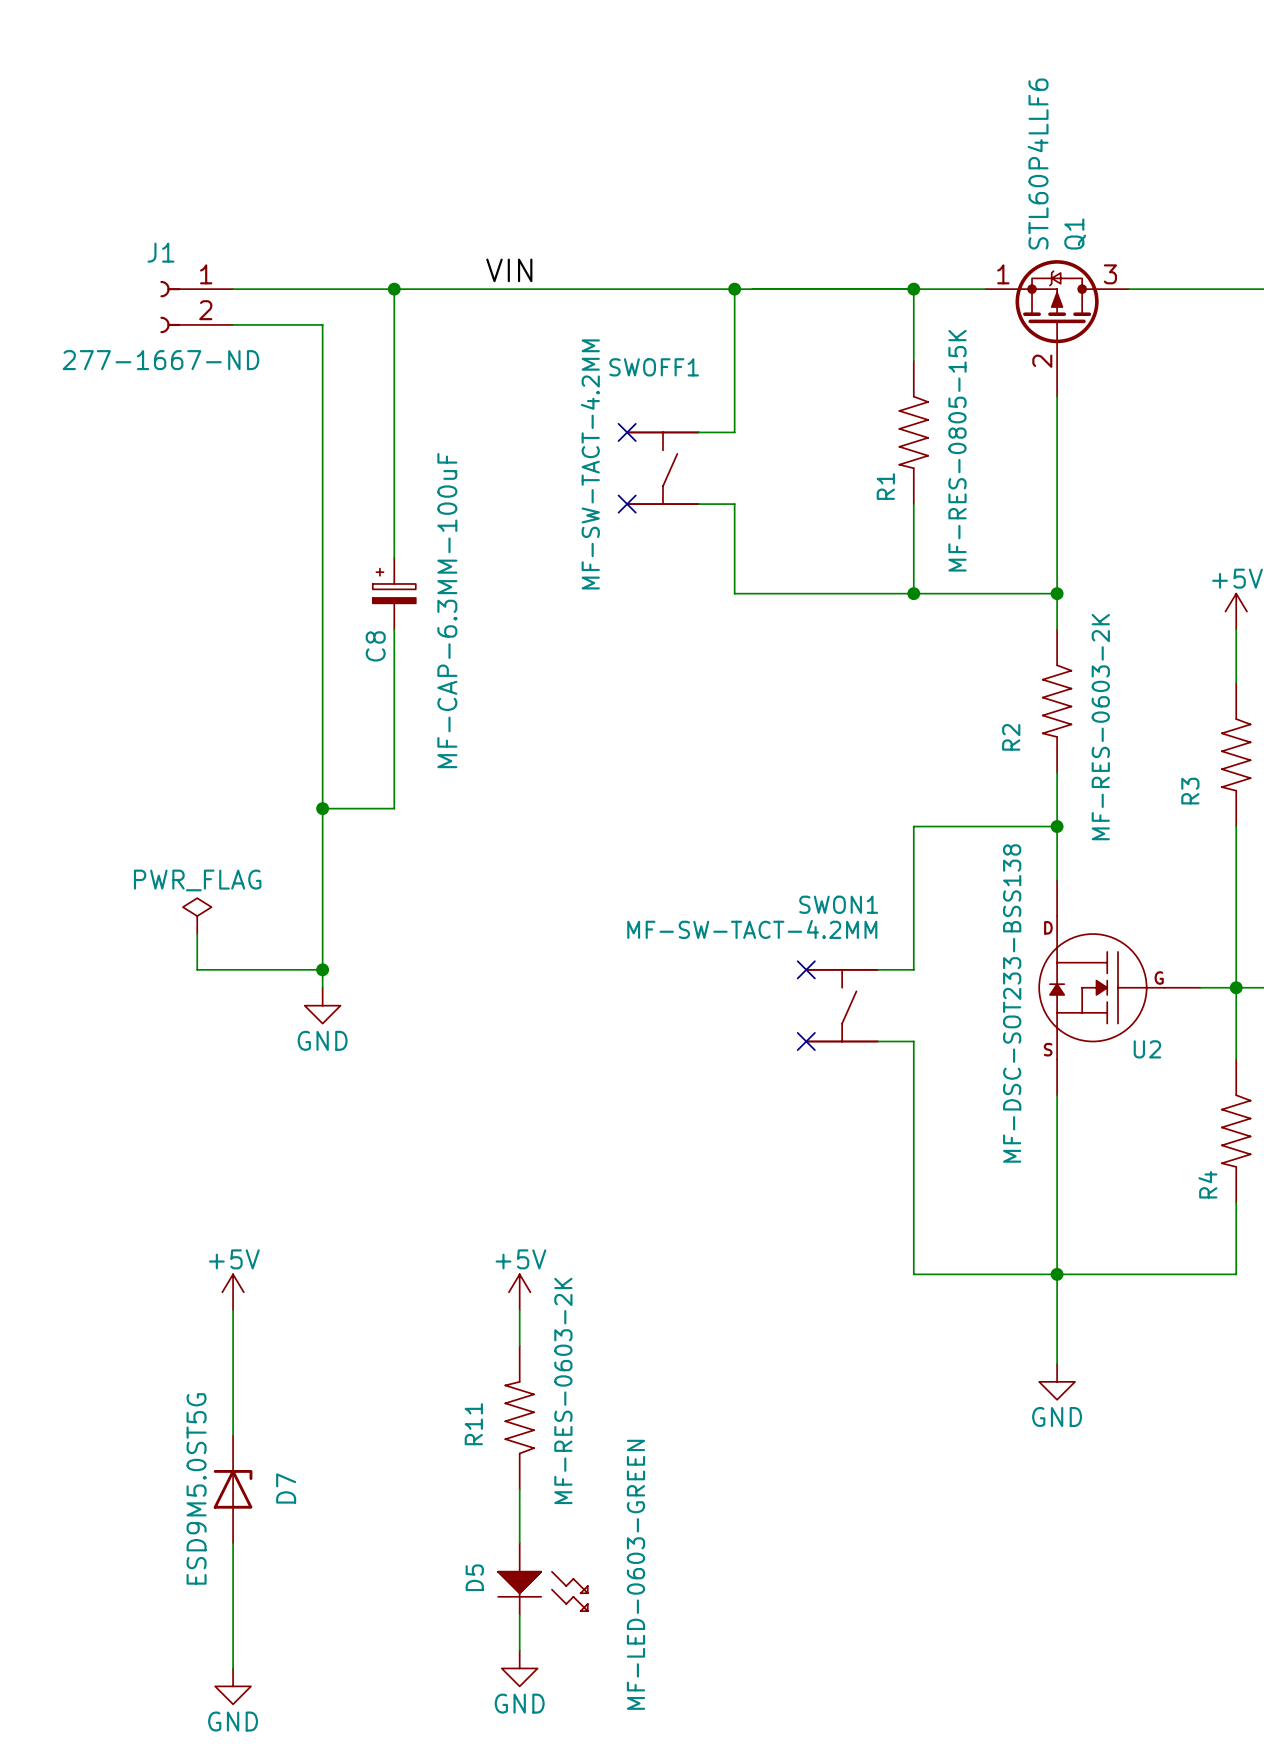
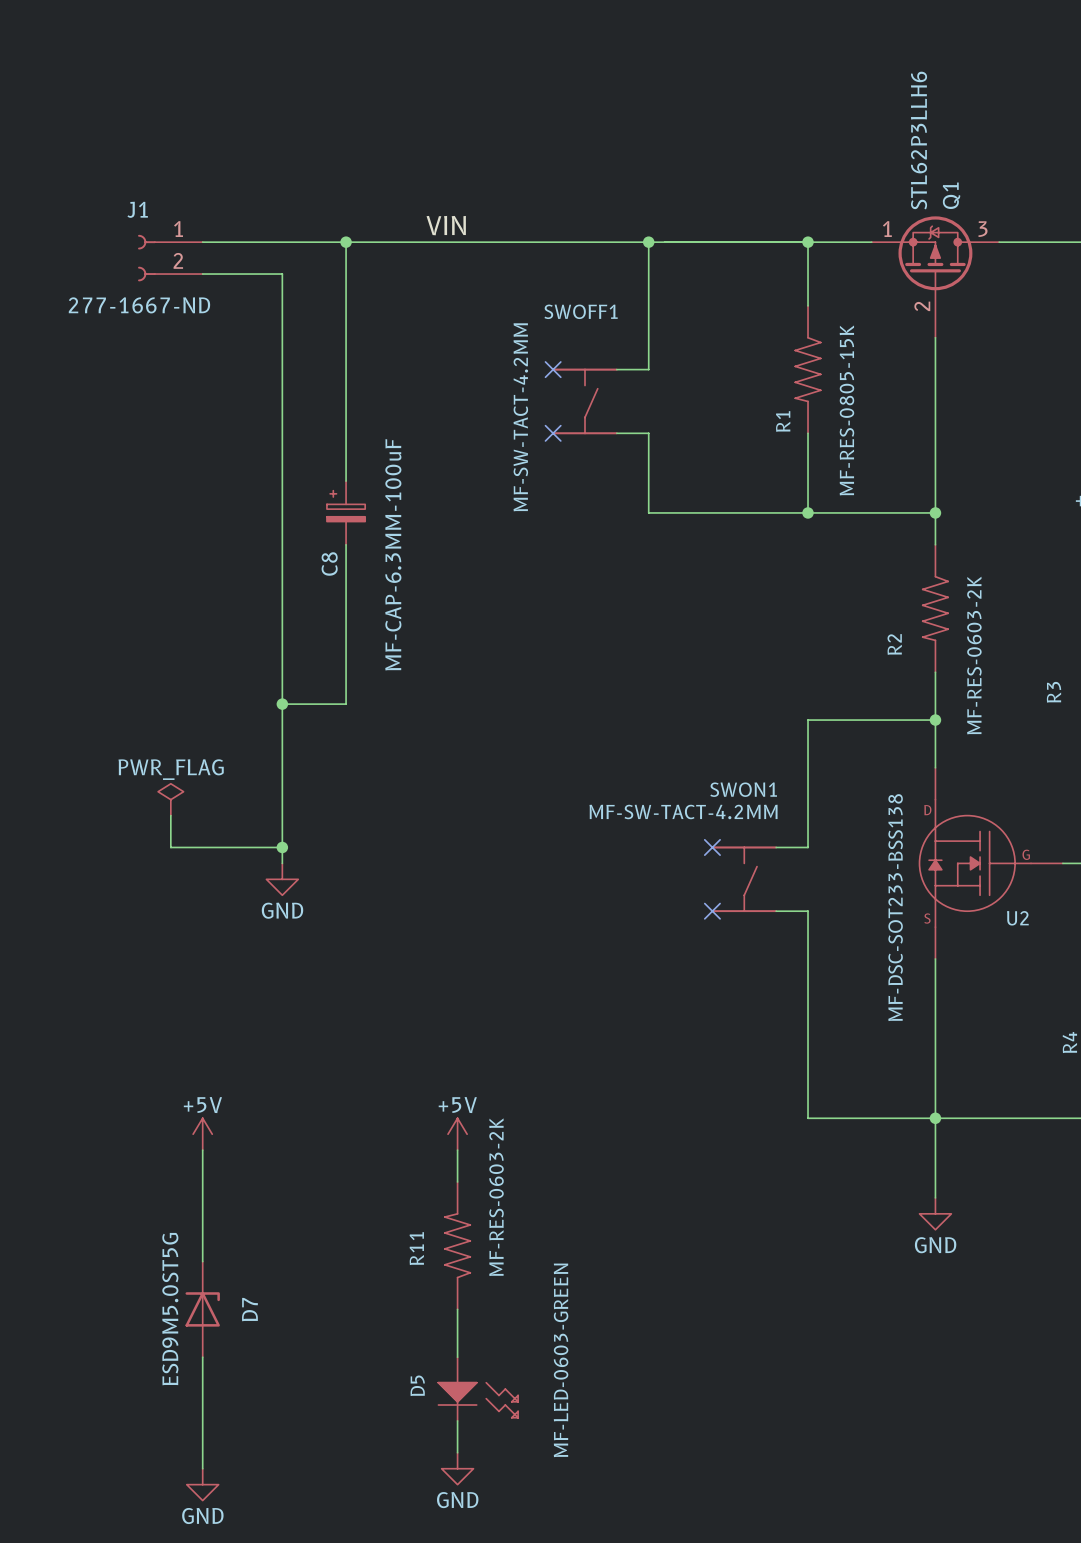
Q1 value: STL60P4LLF6 (1038, 164) -> STL62P3LLH6 (919, 140)

